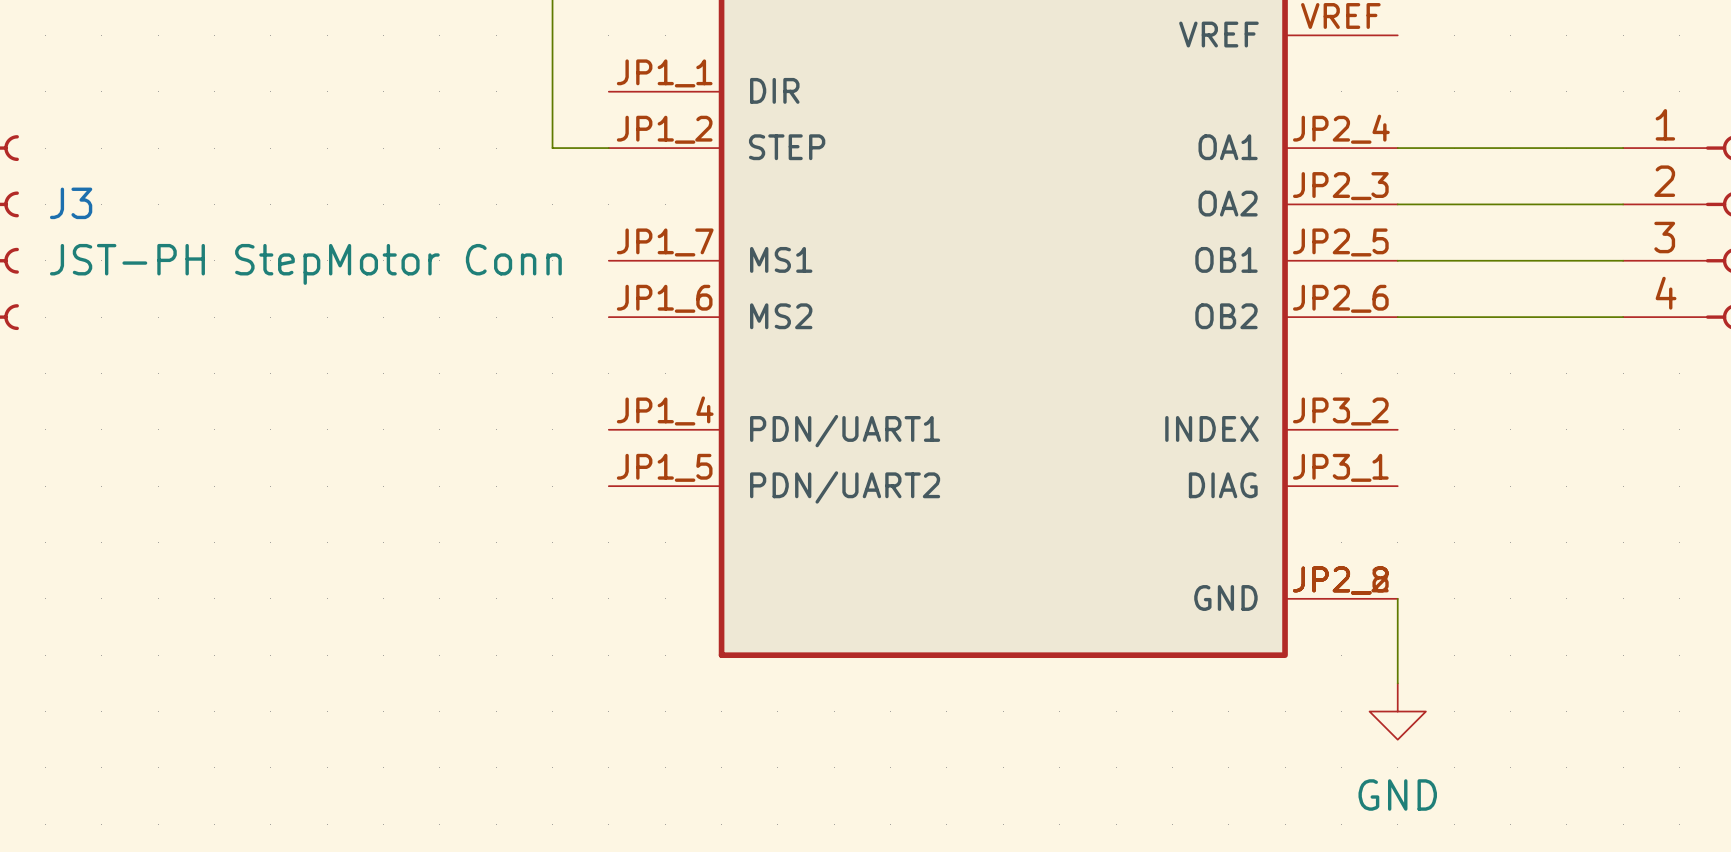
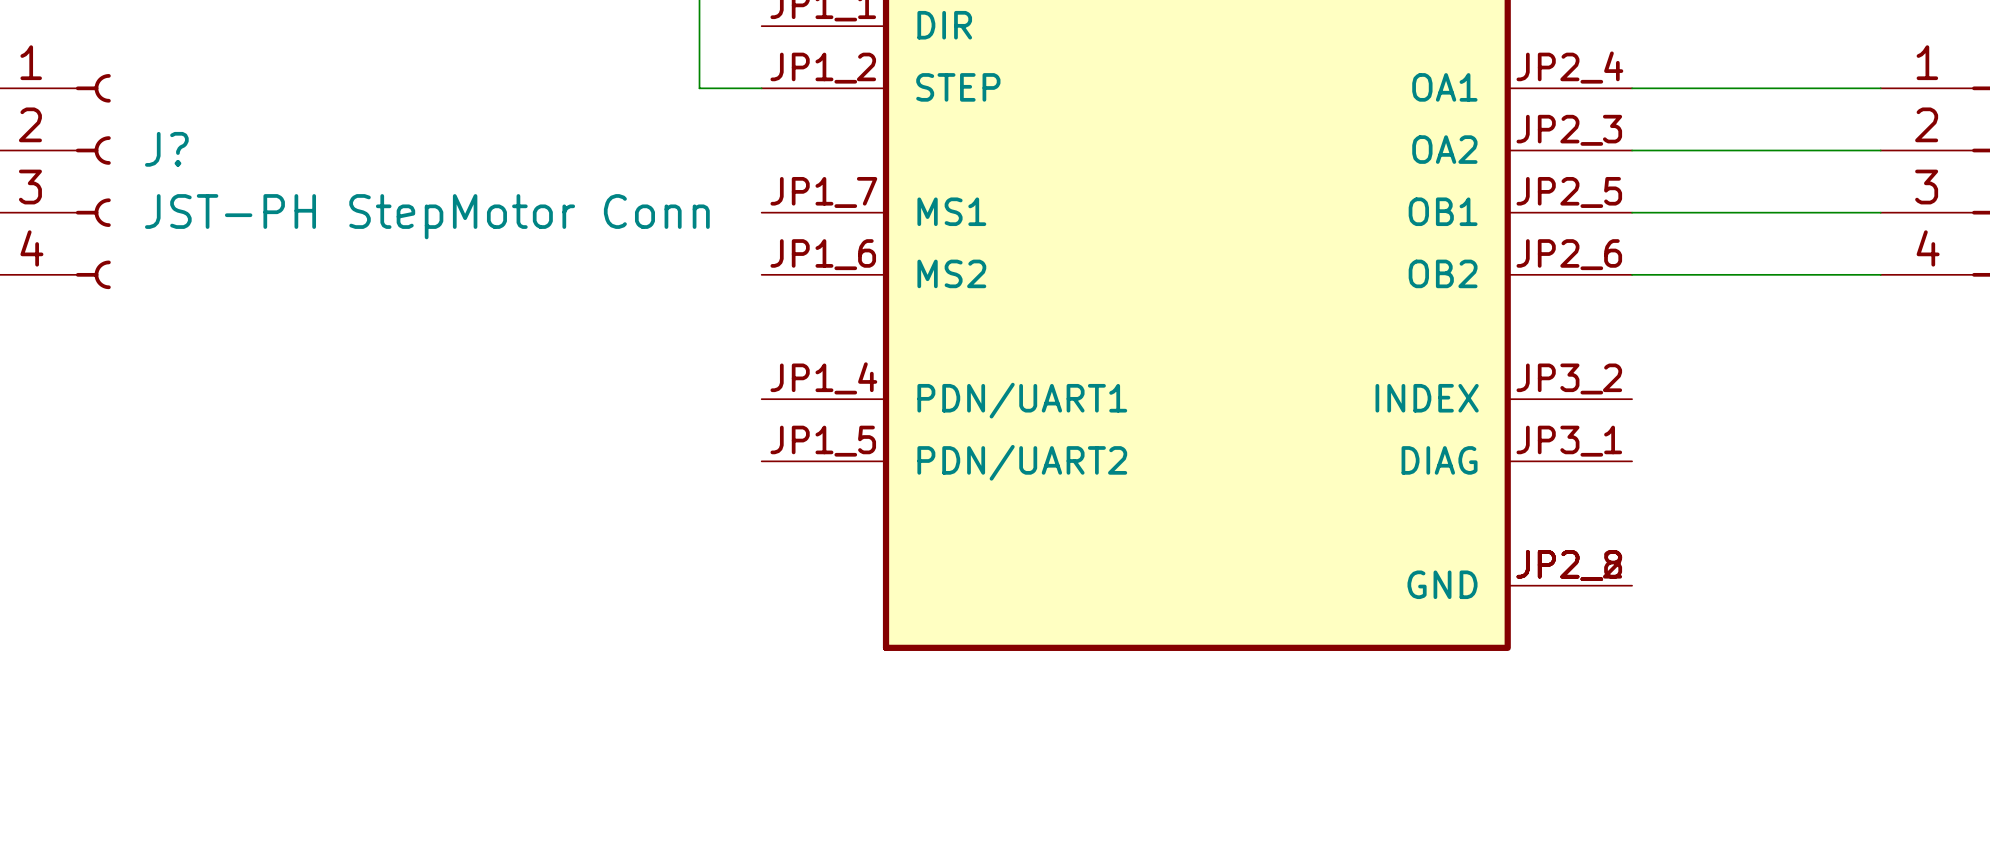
J3 name: J3 (71, 203) -> J? (166, 149)
wire: (1397, 598) (1397, 683) -> none
power symbol: GND (1397, 711) -> none

